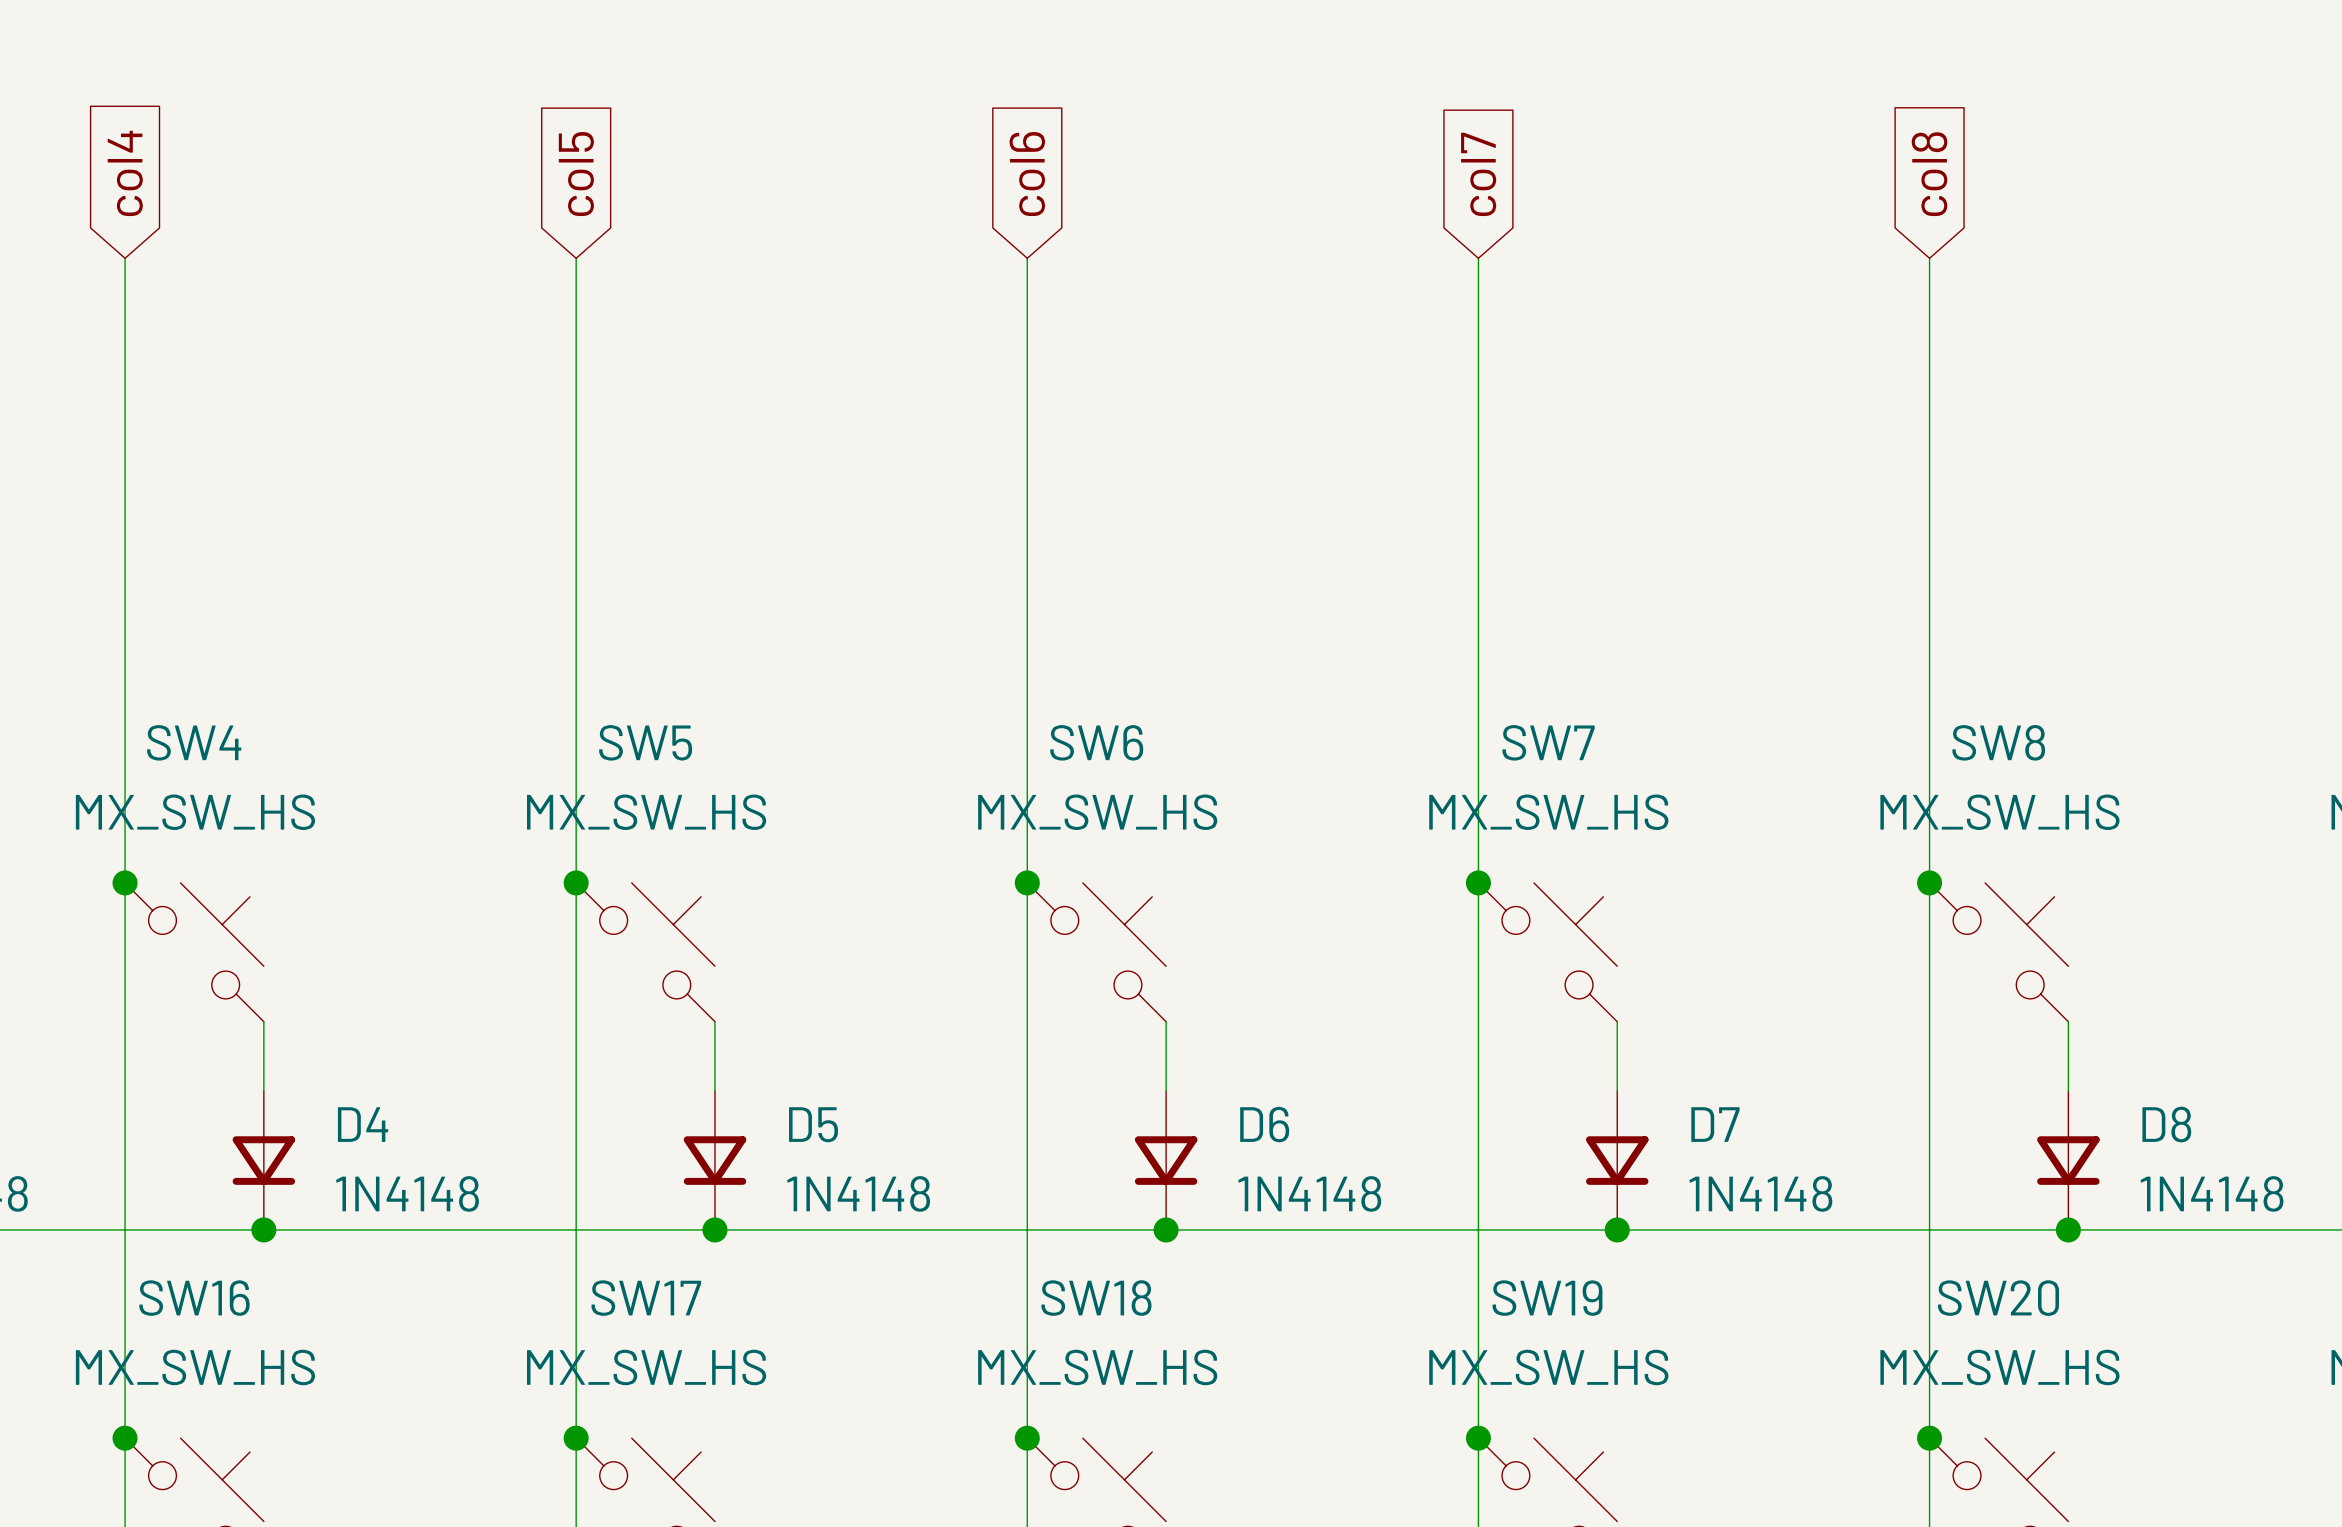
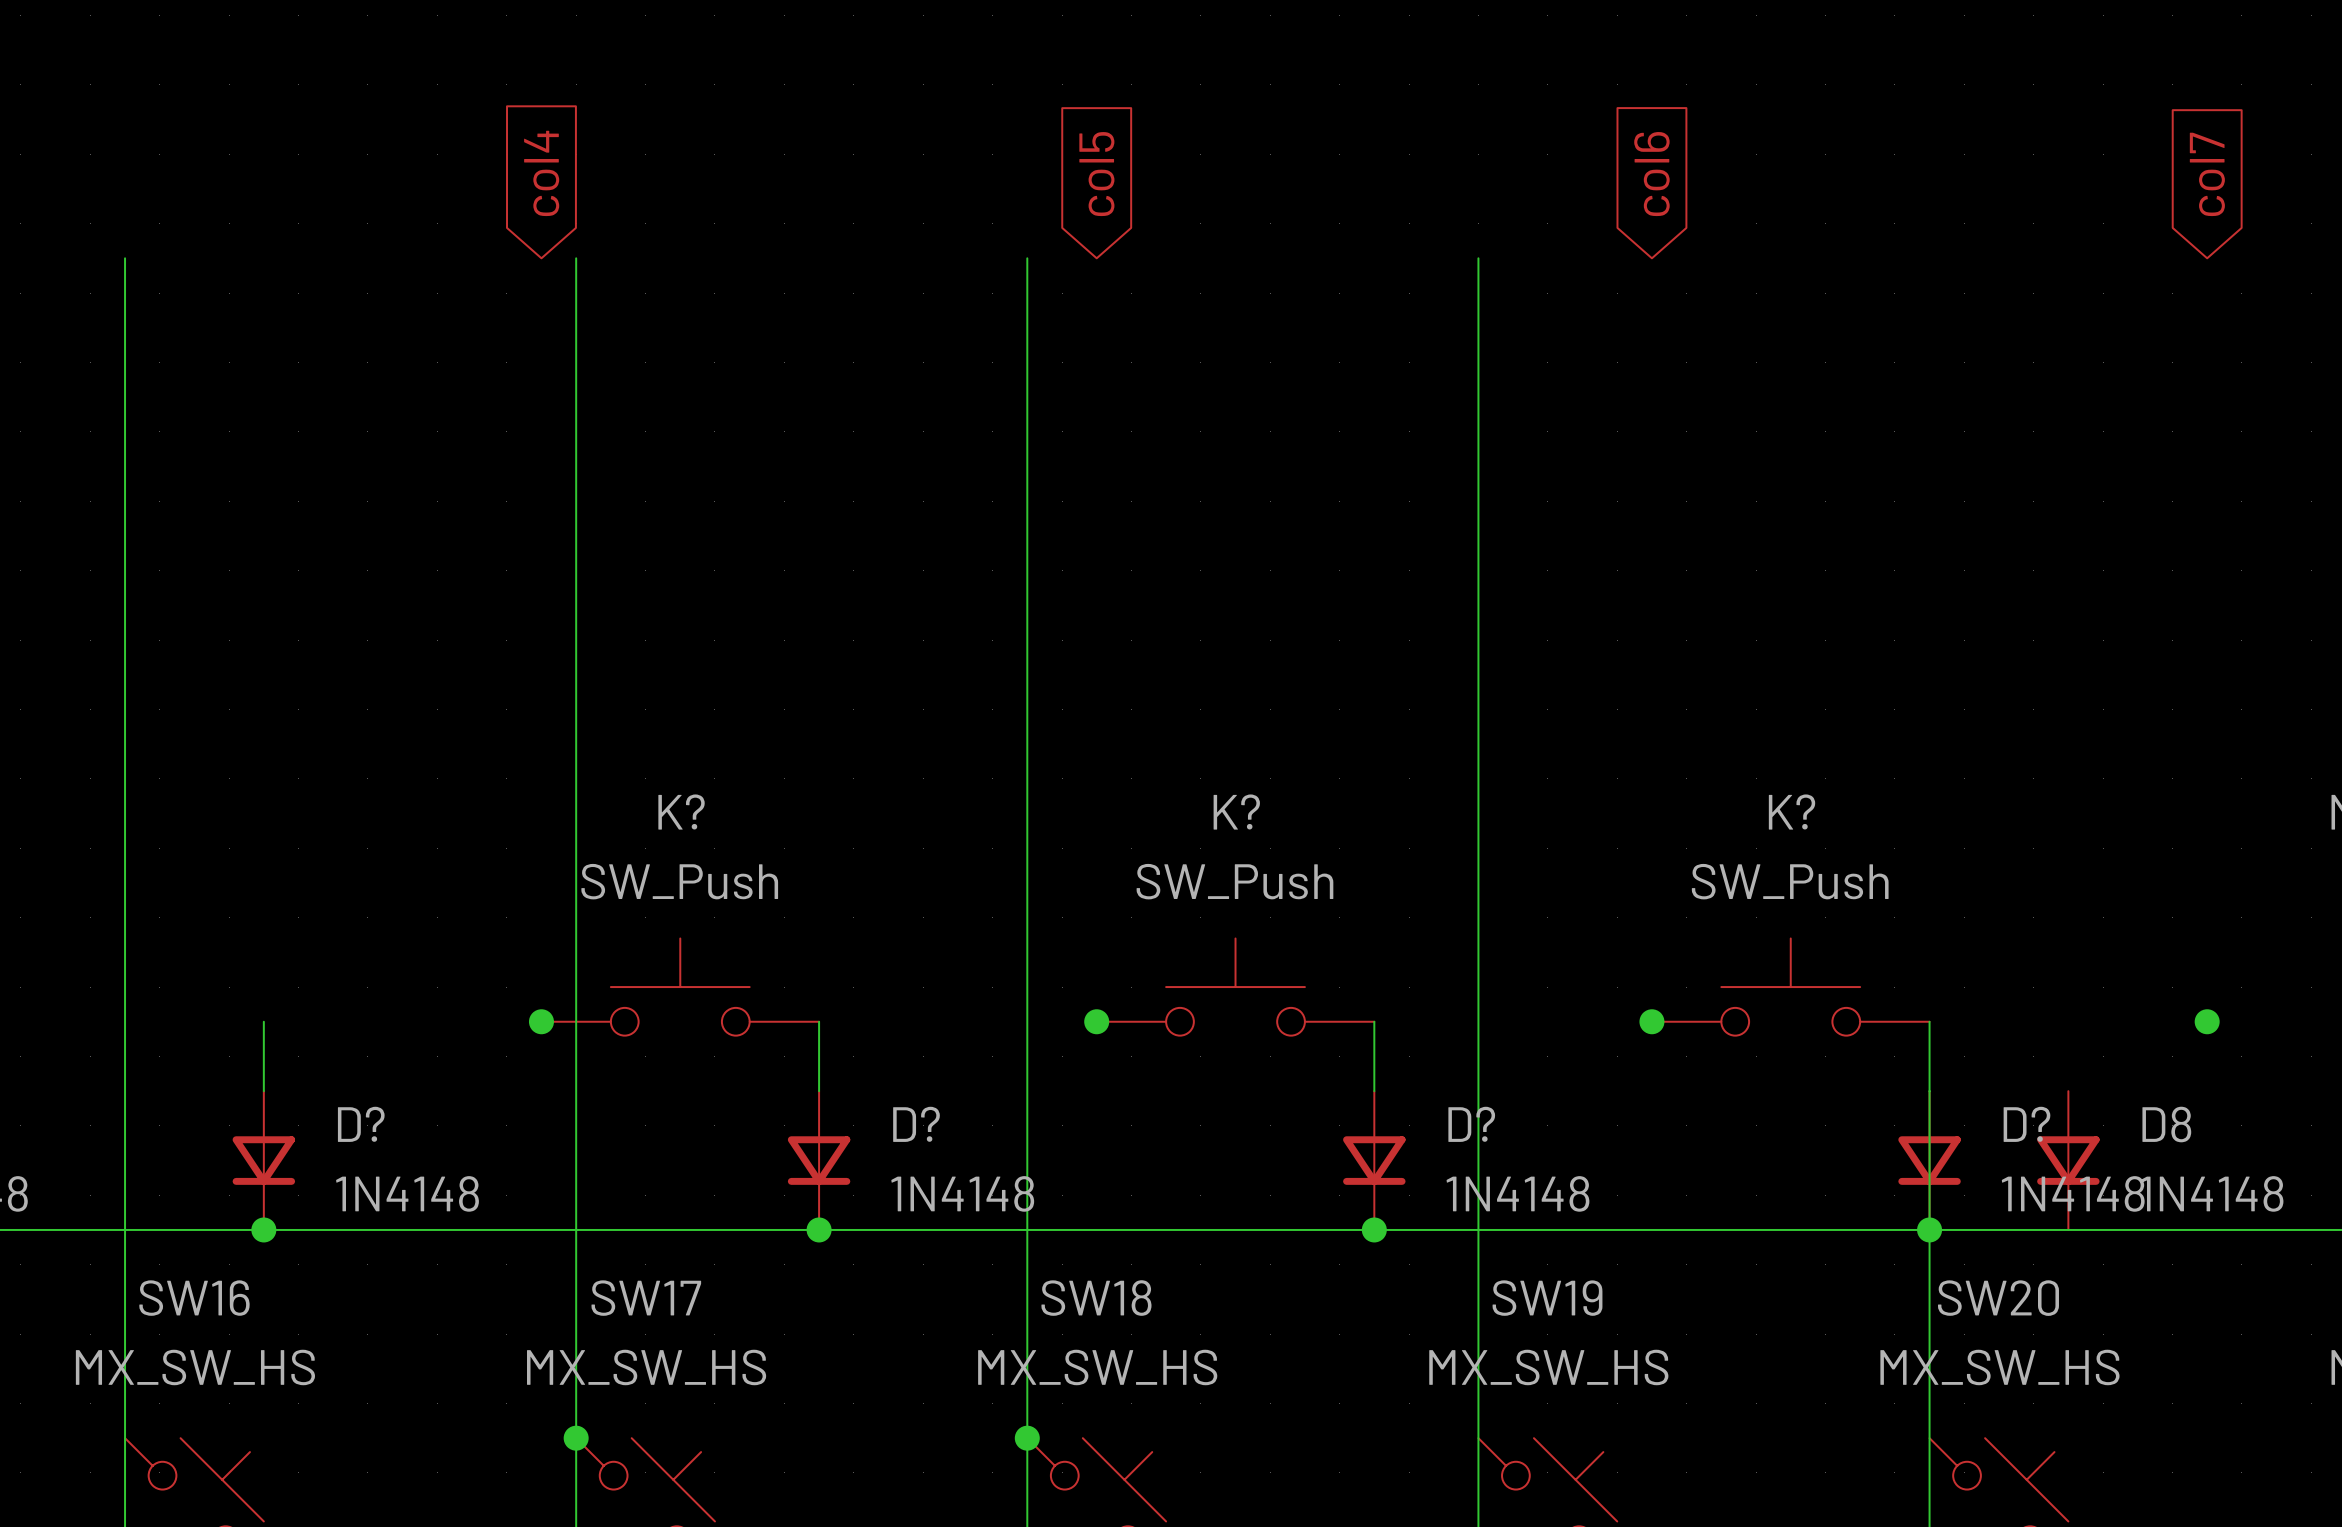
global label position: col4 (125, 173) -> col4 (541, 173)
global label position: col5 (576, 174) -> col5 (1096, 174)
global label position: col6 (1027, 174) -> col6 (1651, 174)
global label: col7 (1478, 174) -> none
global label: col8 (1929, 174) -> none
global label: none -> col7 (2207, 174)
wire: (1929, 258) (1929, 1021) -> none
junction: (125, 882) -> none
junction: (576, 882) -> none
junction: (1027, 882) -> none
junction: (1478, 882) -> none
junction: (1929, 882) -> none
SW4: MX_SW_HS (194, 952) -> none
SW5: MX_SW_HS (645, 952) -> none
SW6: MX_SW_HS (1096, 952) -> none
SW7: MX_SW_HS (1547, 952) -> none
SW8: MX_SW_HS (1998, 952) -> none
K?: none -> SW_Push (680, 987)
K?: none -> SW_Push (1235, 987)
K?: none -> SW_Push (1790, 987)
junction: none -> (541, 1021)
wire: (714, 1021) (714, 1091) -> (819, 1021) (819, 1091)
junction: none -> (1096, 1021)
wire: (1166, 1021) (1166, 1091) -> (1374, 1021) (1374, 1091)
wire: (1617, 1021) (1617, 1091) -> none
junction: none -> (1651, 1021)
wire: (2068, 1021) (2068, 1091) -> none
junction: none -> (2207, 1021)
D4 name: D4 (363, 1124) -> D? (361, 1124)
D5: 1N4148 (714, 1160) -> none
D?: none -> 1N4148 (819, 1160)
D6: 1N4148 (1166, 1160) -> none
D?: none -> 1N4148 (1374, 1160)
D7: 1N4148 (1617, 1160) -> none
D?: none -> 1N4148 (1929, 1160)
junction position: (714, 1229) -> (819, 1229)
junction: (1166, 1229) -> none
junction: none -> (1374, 1229)
junction: (1617, 1229) -> none
junction: none -> (1929, 1229)
junction: (2068, 1229) -> none
junction: (125, 1438) -> none
junction: (1478, 1438) -> none
junction: (1929, 1438) -> none

